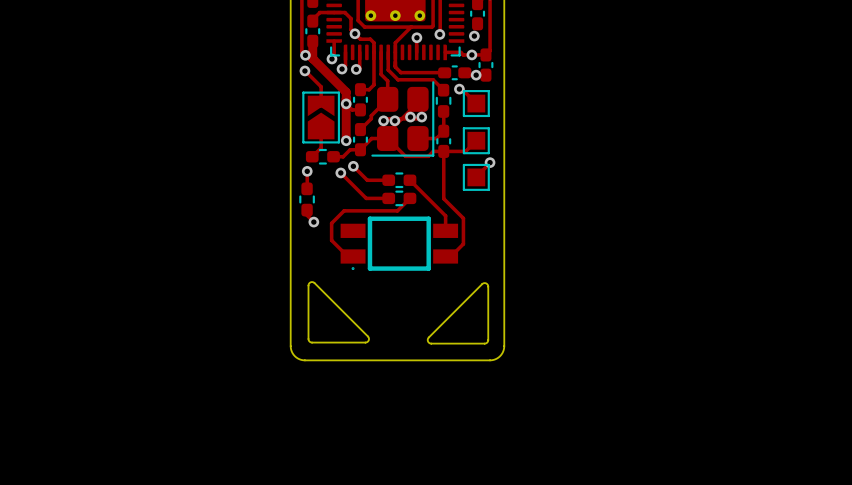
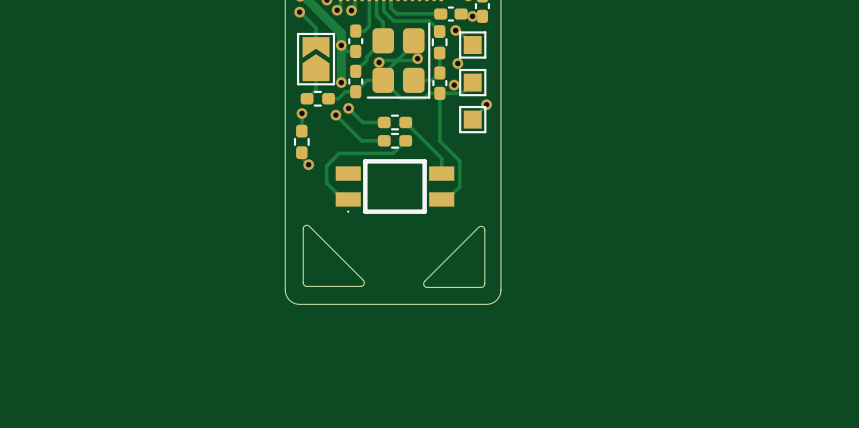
via: (410, 117) -> none
via: (394, 120) -> none
via: none -> (457, 63)
via: none -> (454, 85)

